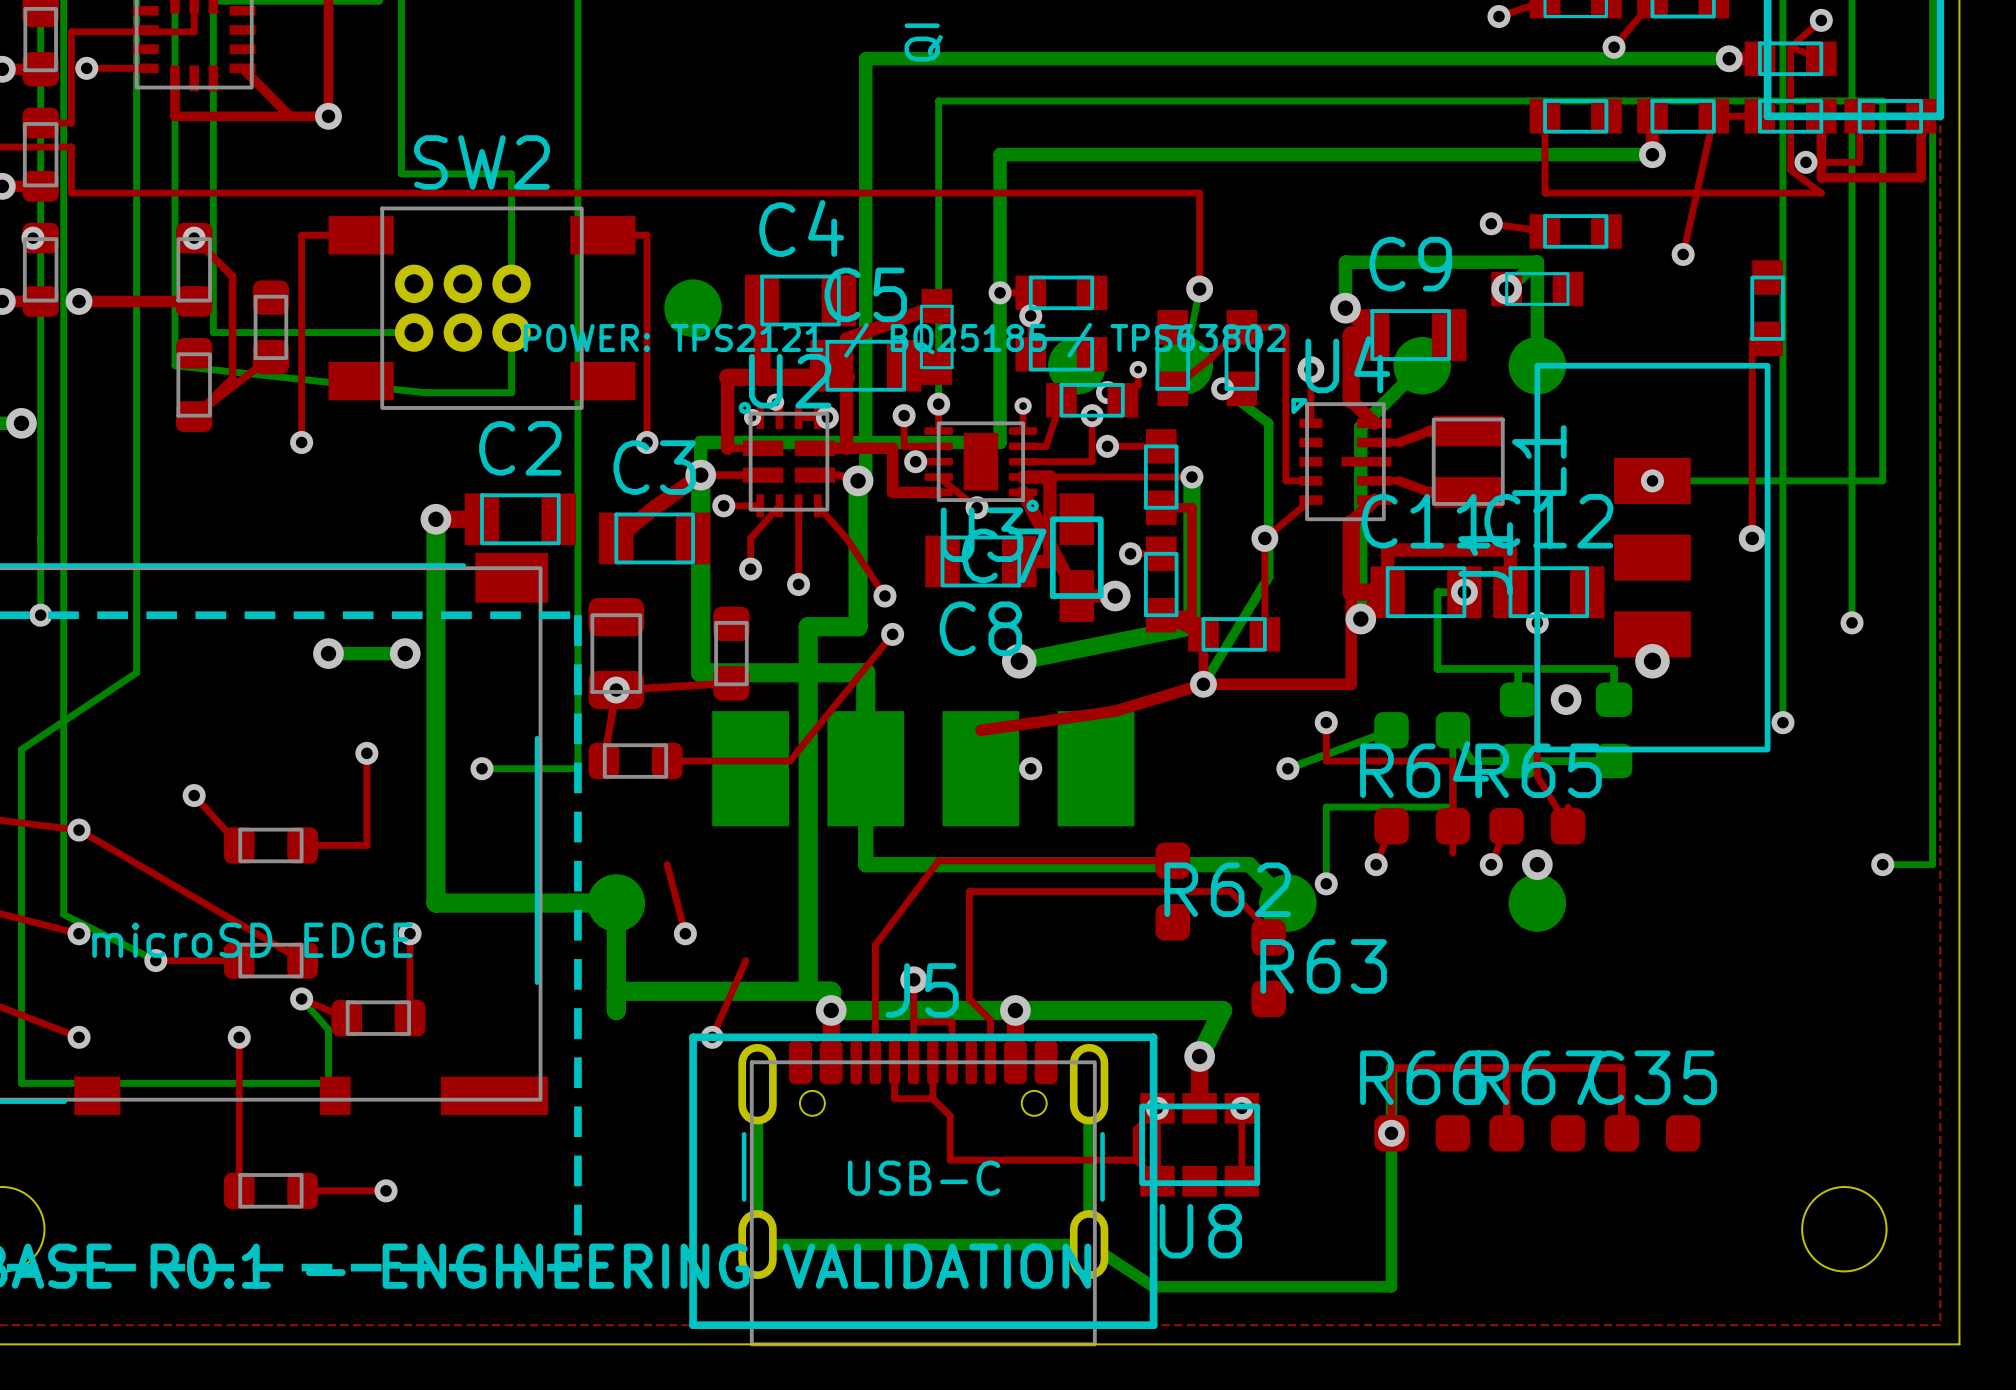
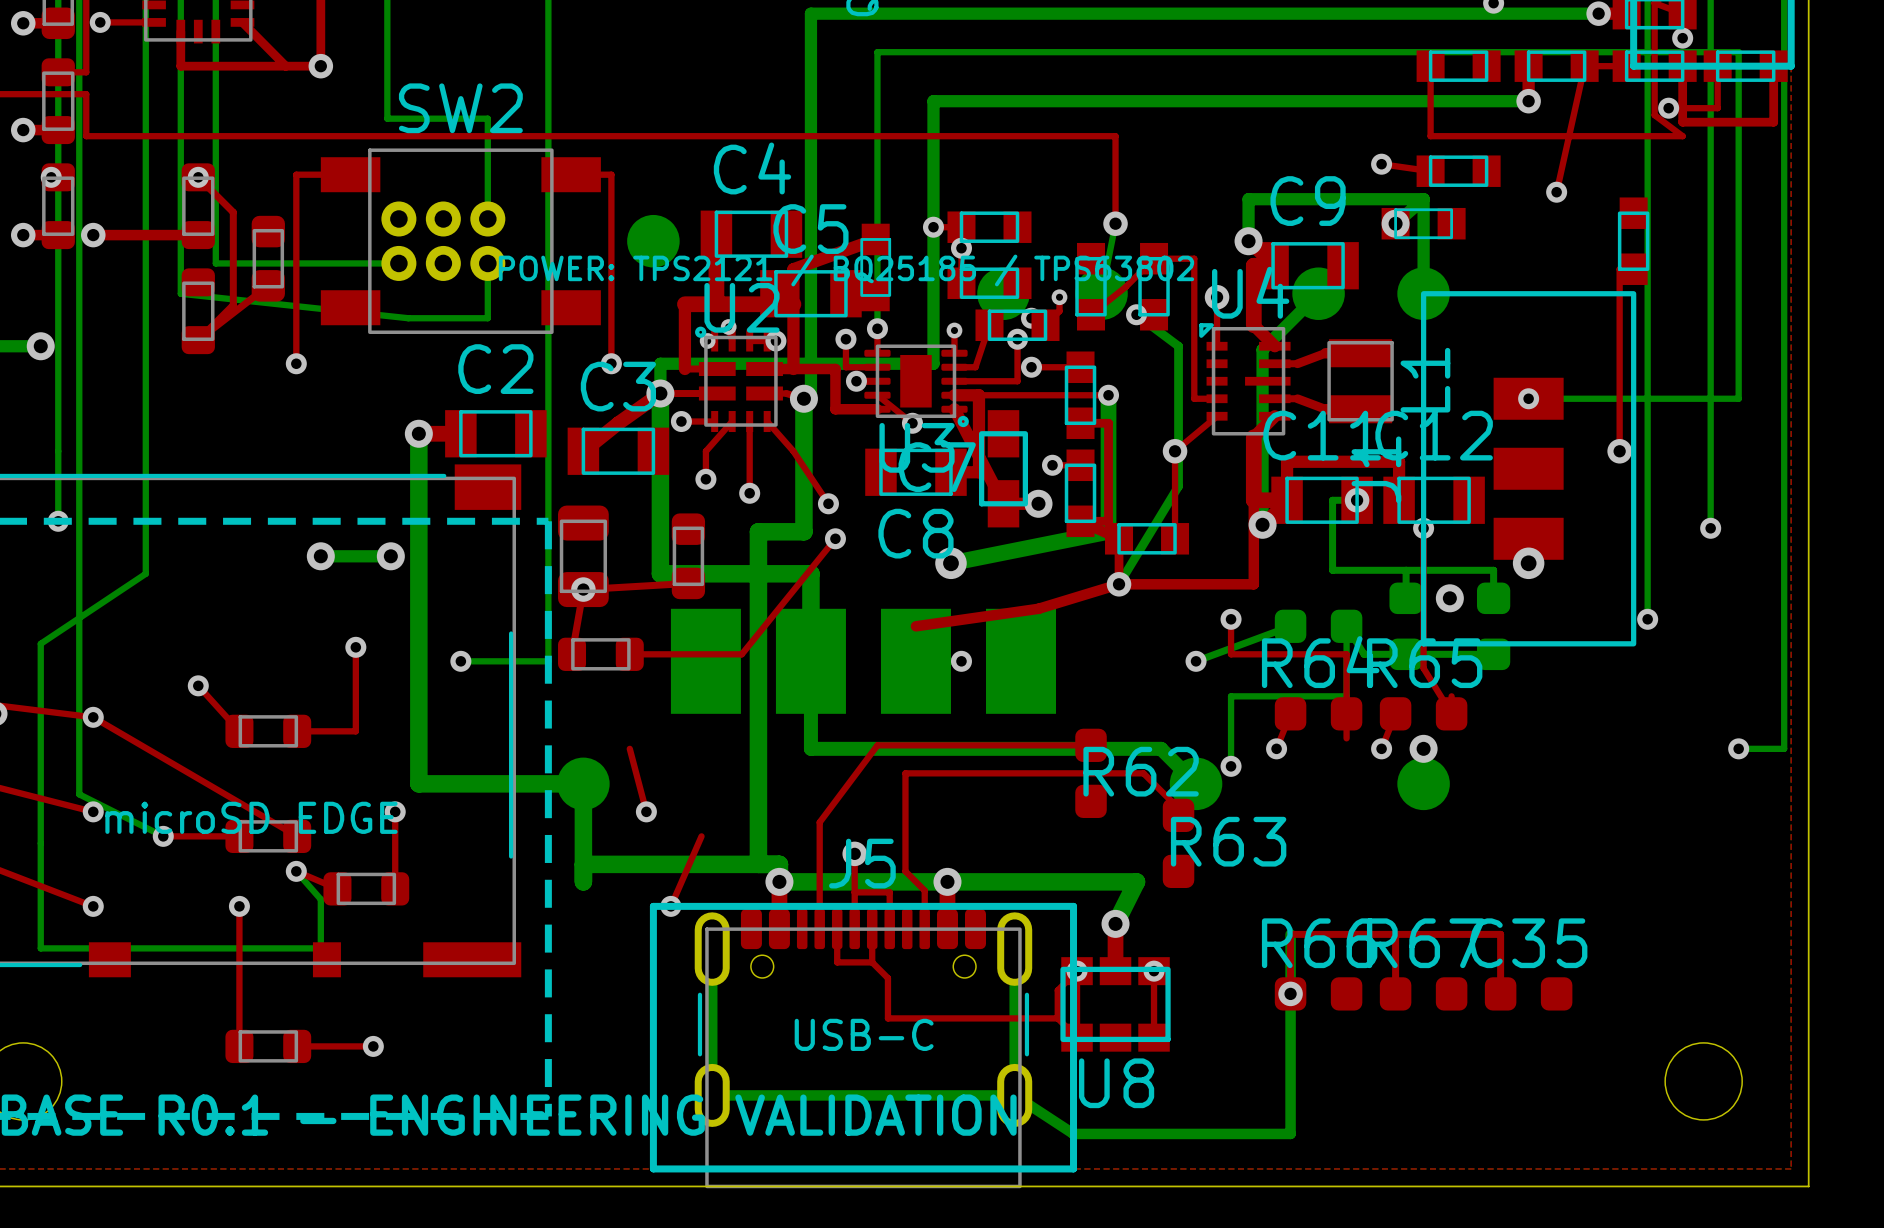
via: none -> (1682, 38)

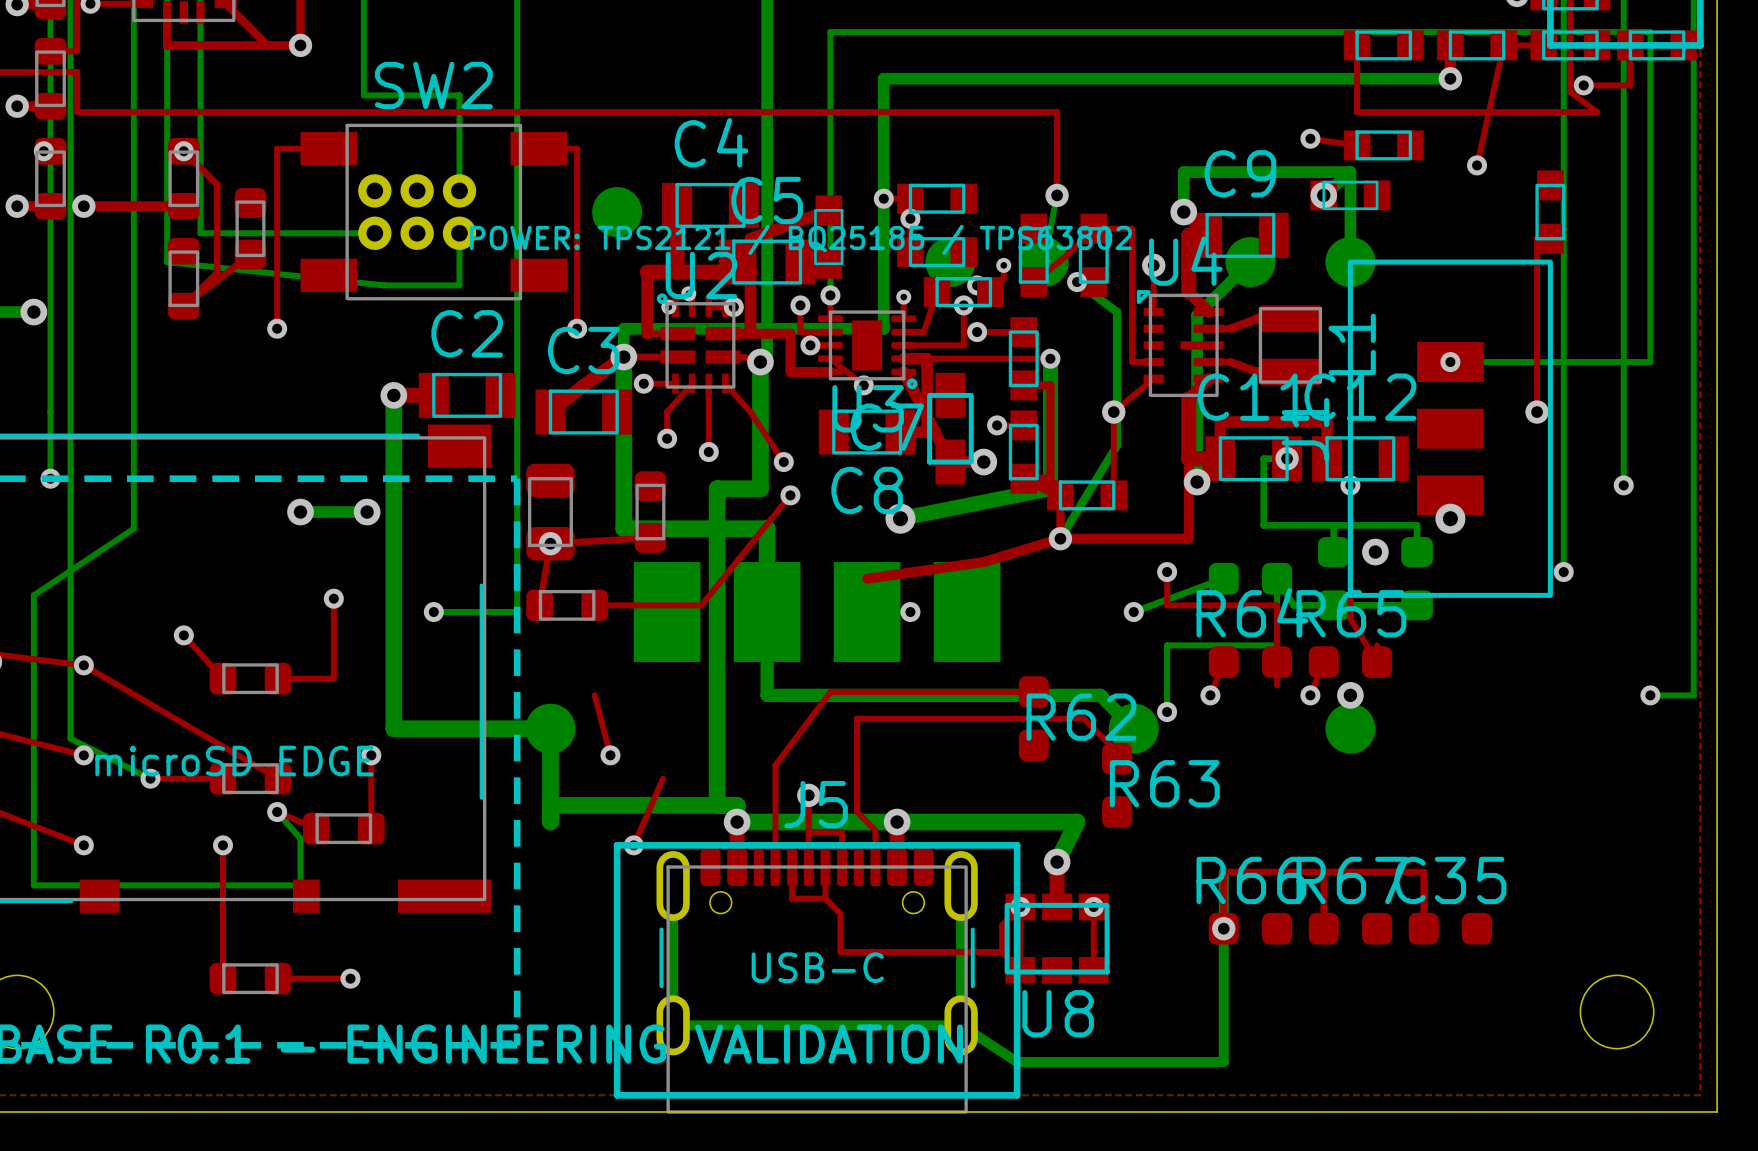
via: (1682, 38) -> none
top track: (1682, 66) (1682, 122) (1773, 122) (1773, 66) -> none

